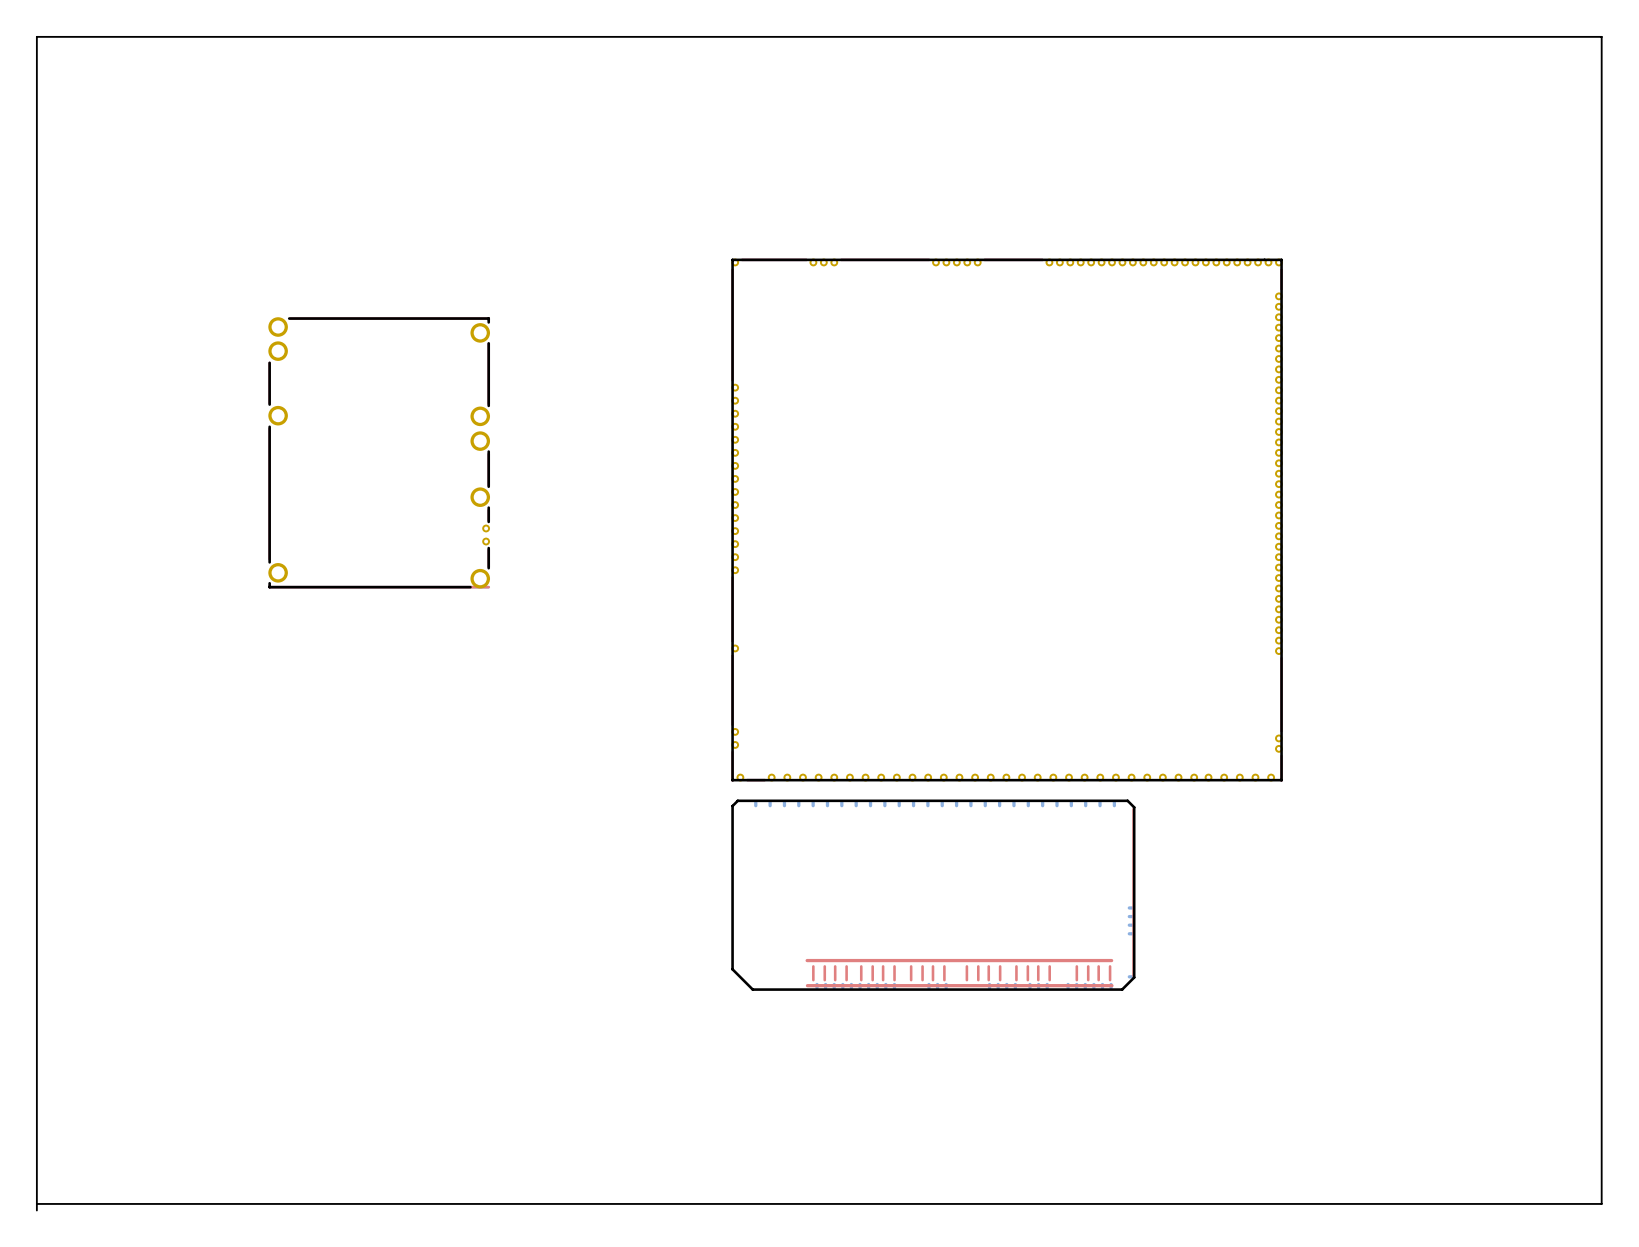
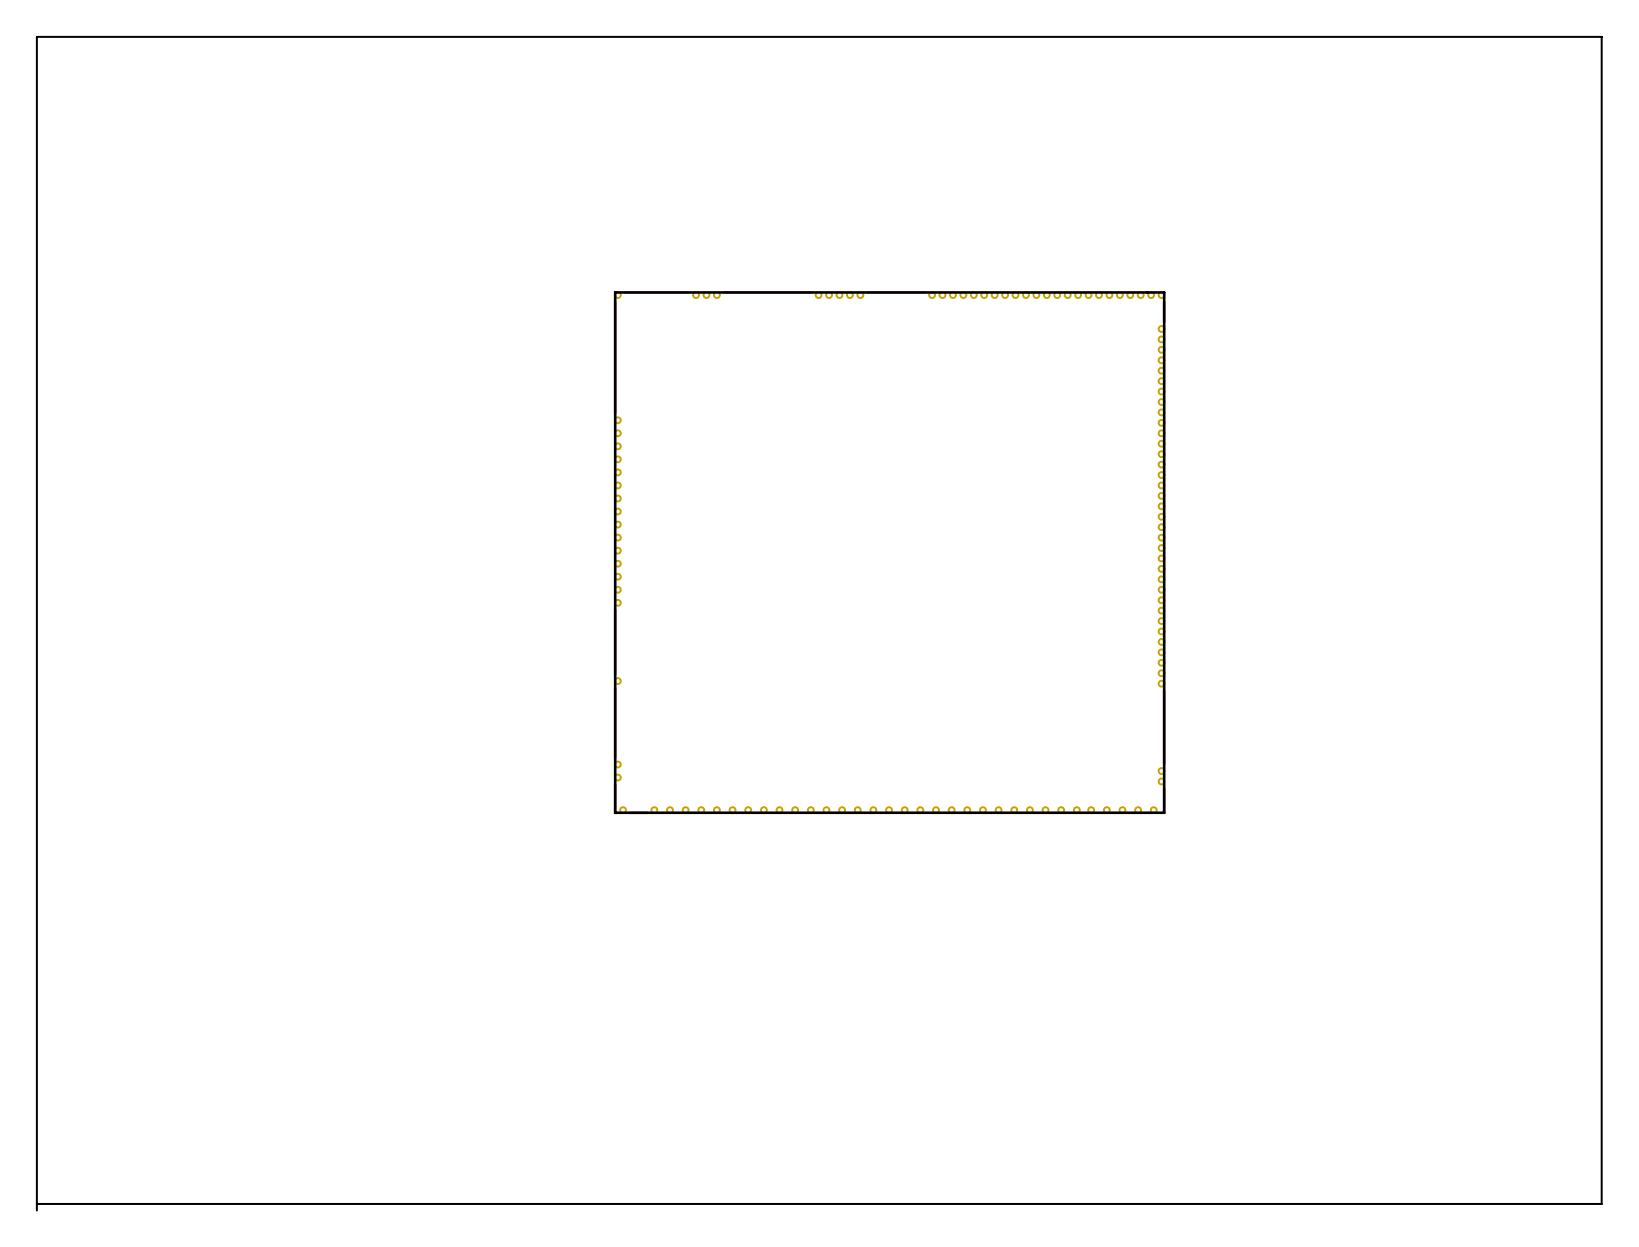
part: (379, 452) -> none
part position: (1007, 520) -> (889, 552)
part: (933, 895) -> none

